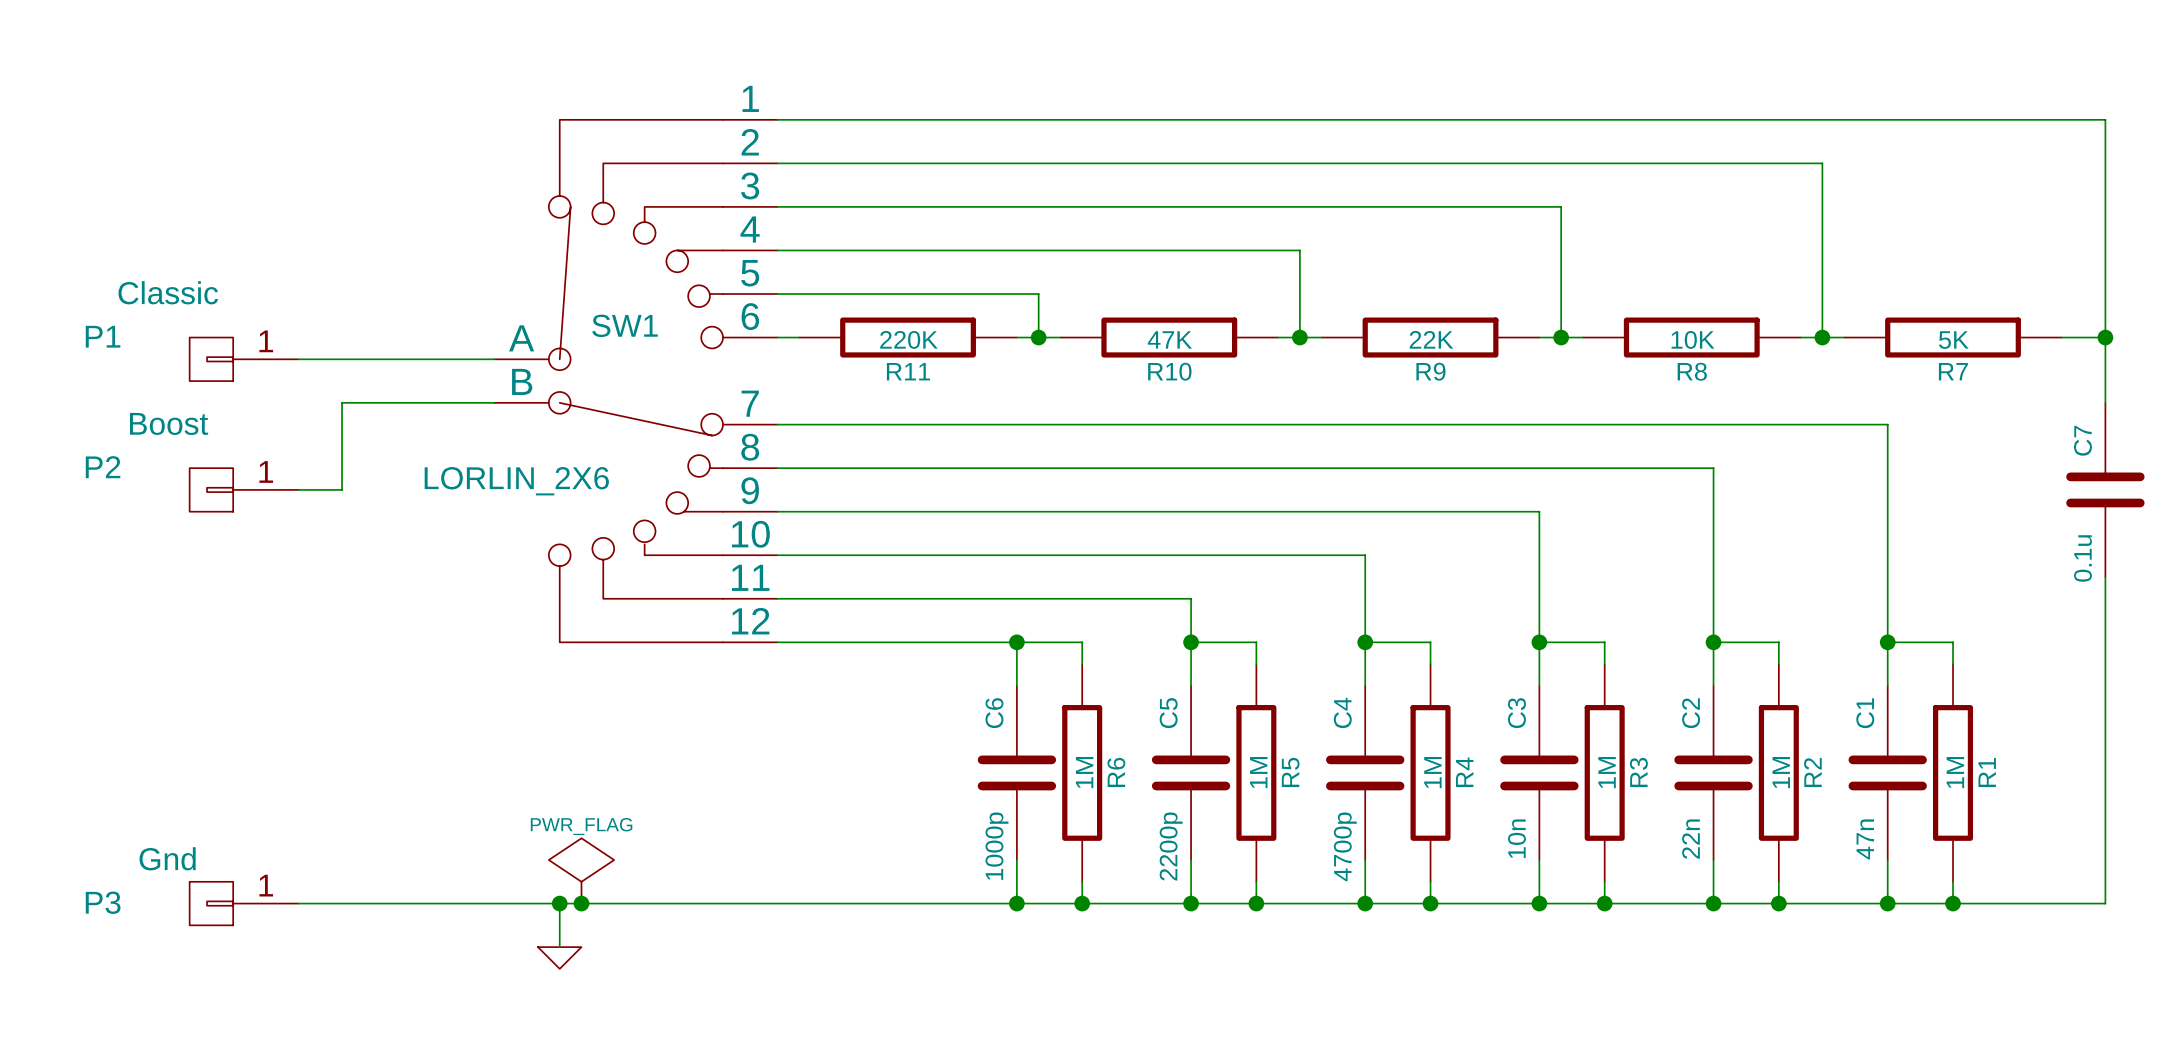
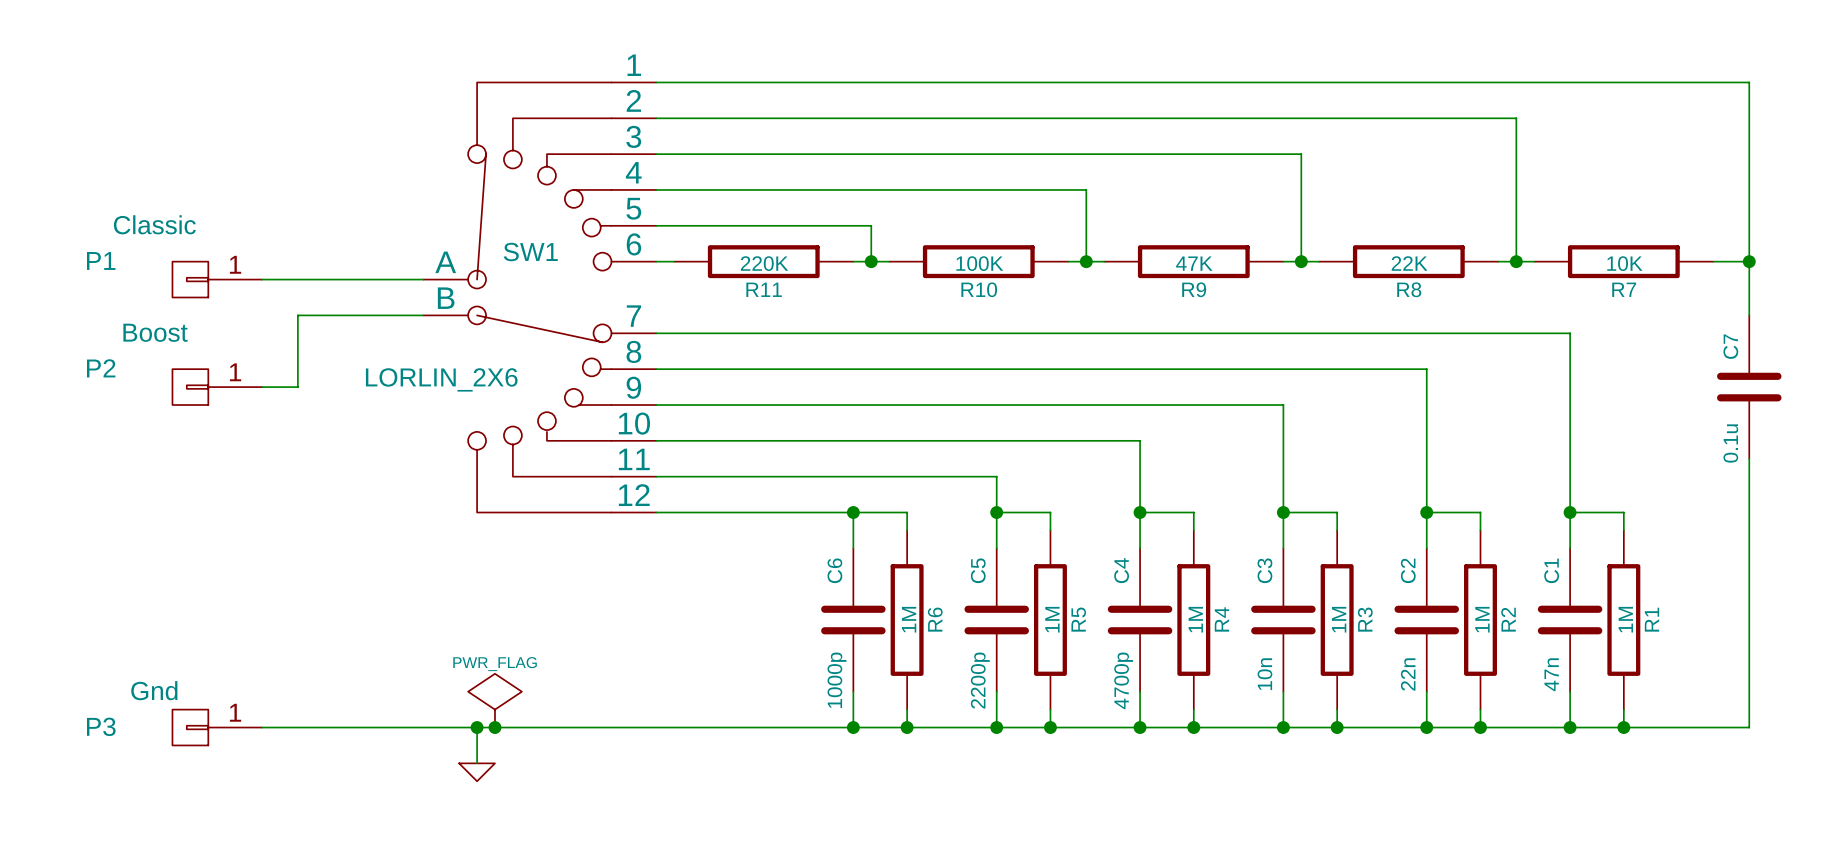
R10 value: 47K (1169, 339) -> 100K (979, 263)
R9 value: 22K (1431, 339) -> 47K (1194, 263)
R8 value: 10K (1693, 339) -> 22K (1409, 263)
R7 value: 5K (1953, 340) -> 10K (1624, 263)

